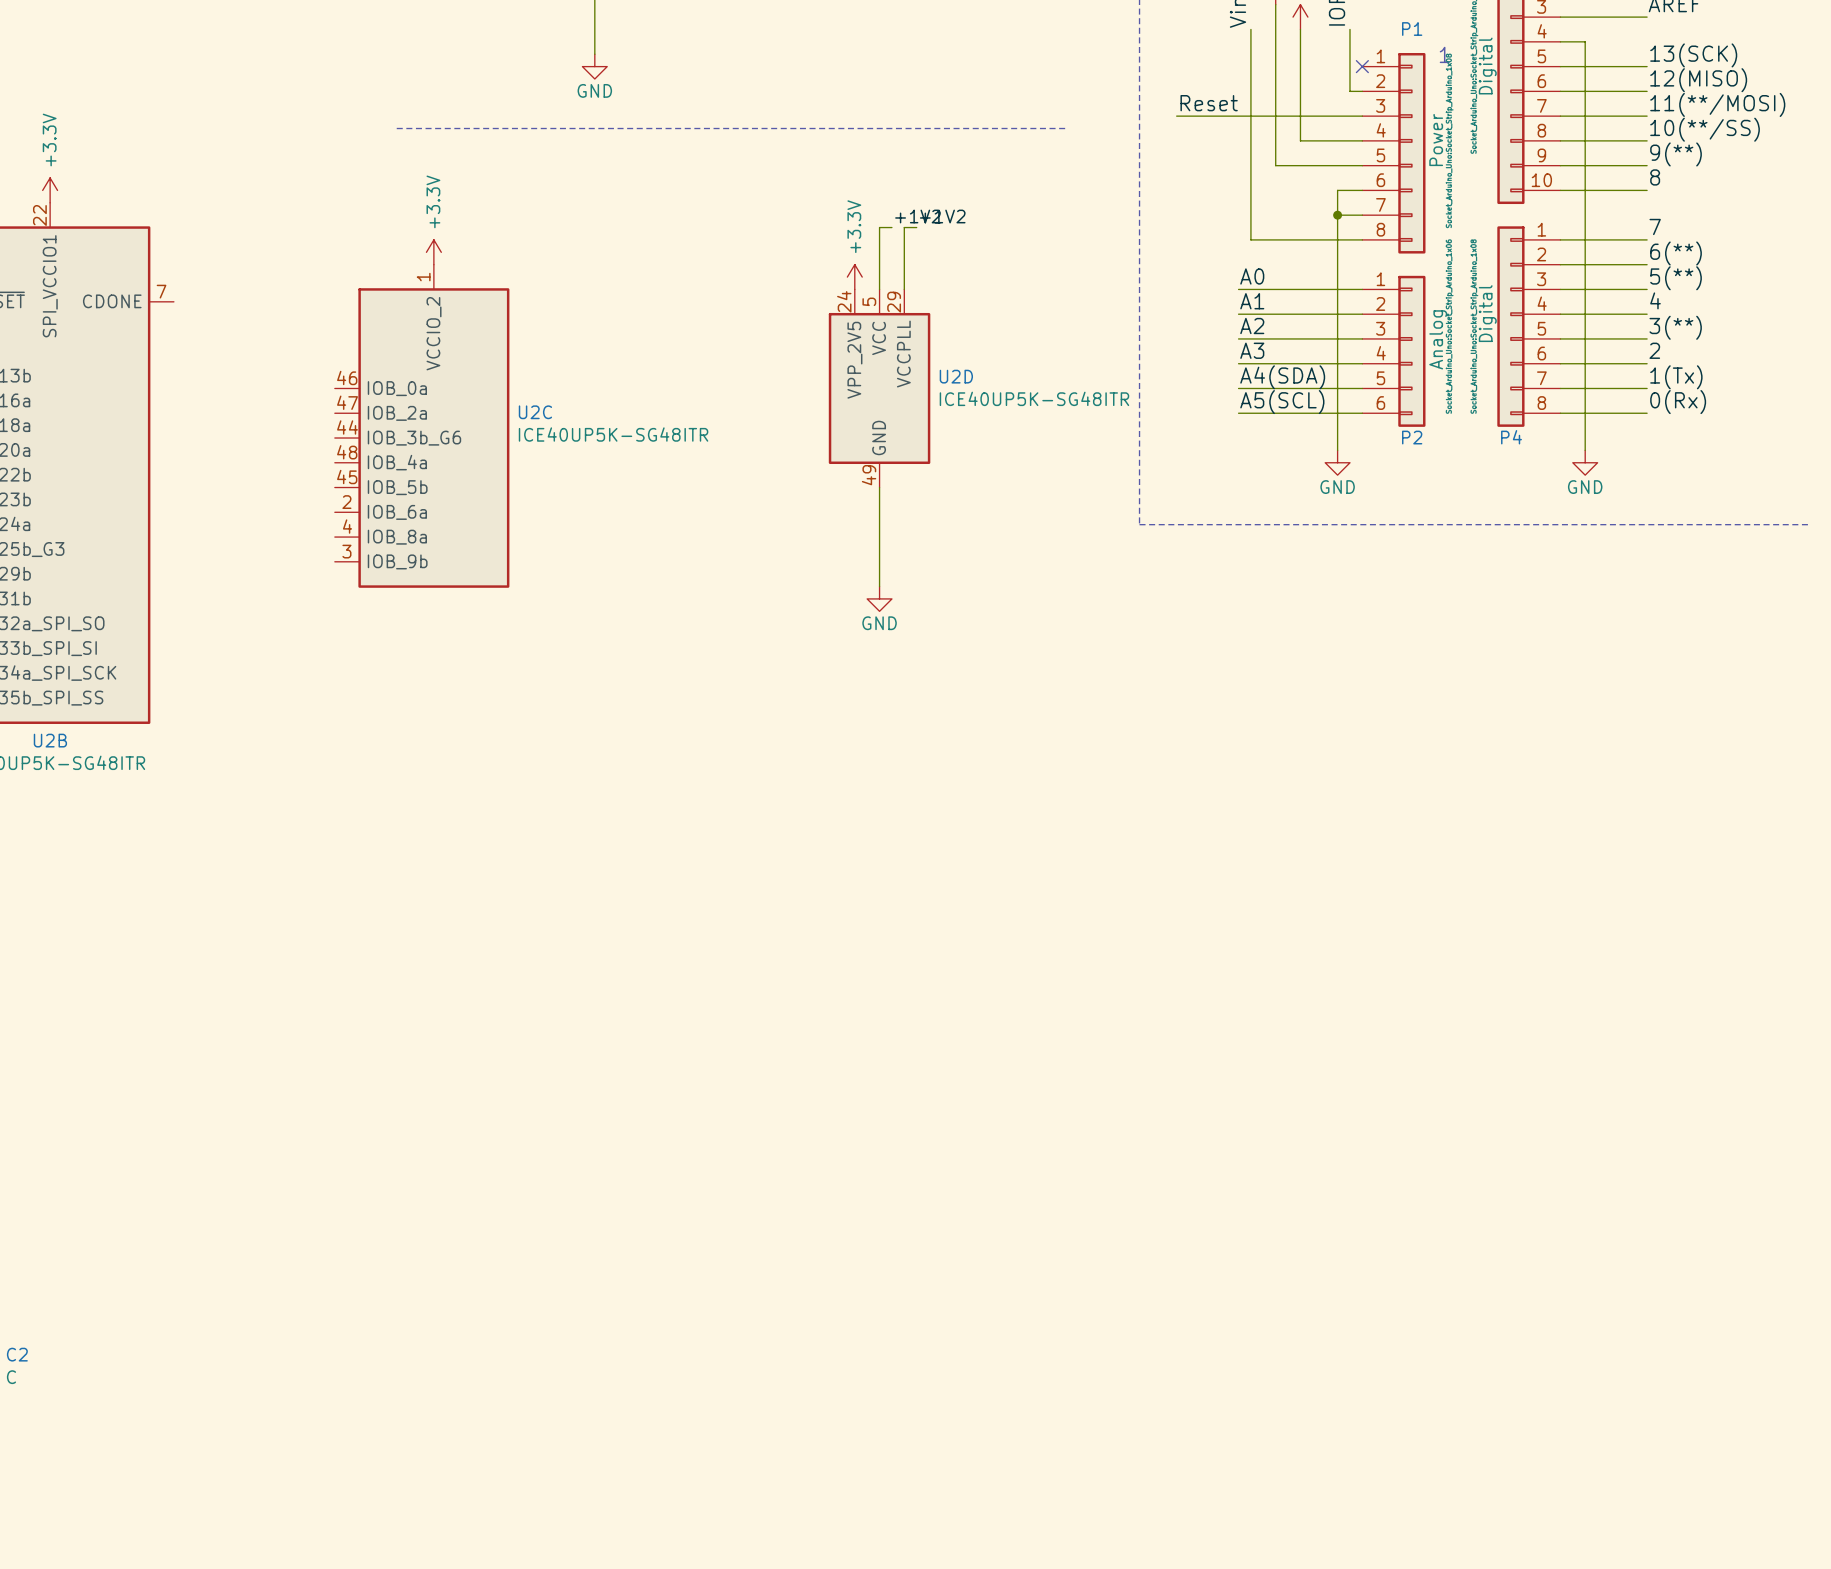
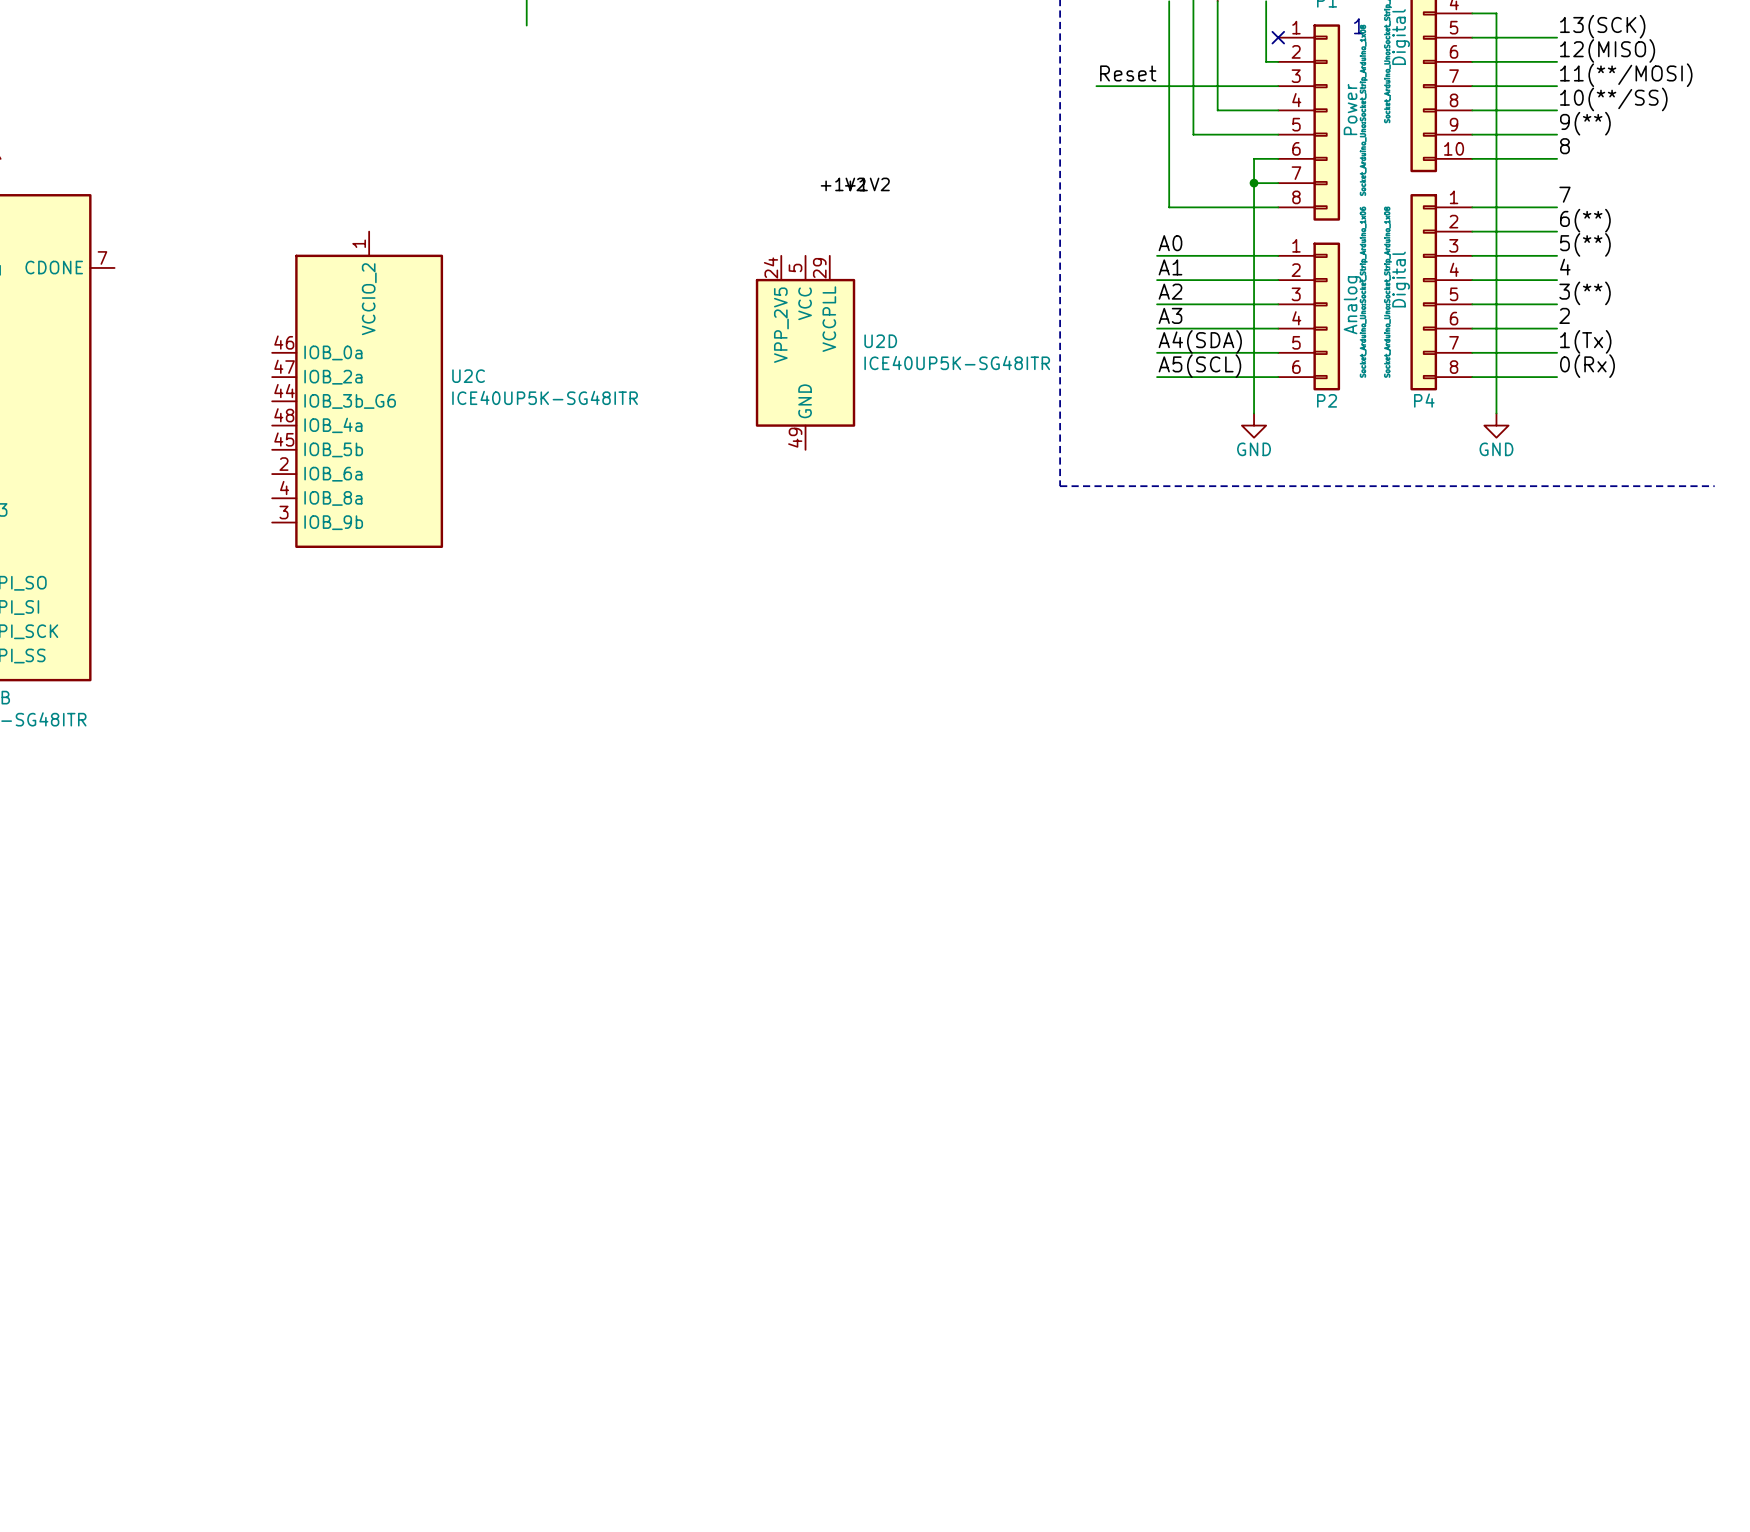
power symbol: GND (594, 66) -> none
line: (396, 128) (1065, 128) -> none
wire: (891, 227) (879, 227) (879, 289) -> none
wire: (916, 227) (904, 227) (904, 289) -> none
power symbol: +3.3V (433, 252) -> none
power symbol: +3.3V (854, 277) -> none
wire: (879, 487) (879, 586) -> none
power symbol: GND (879, 598) -> none

